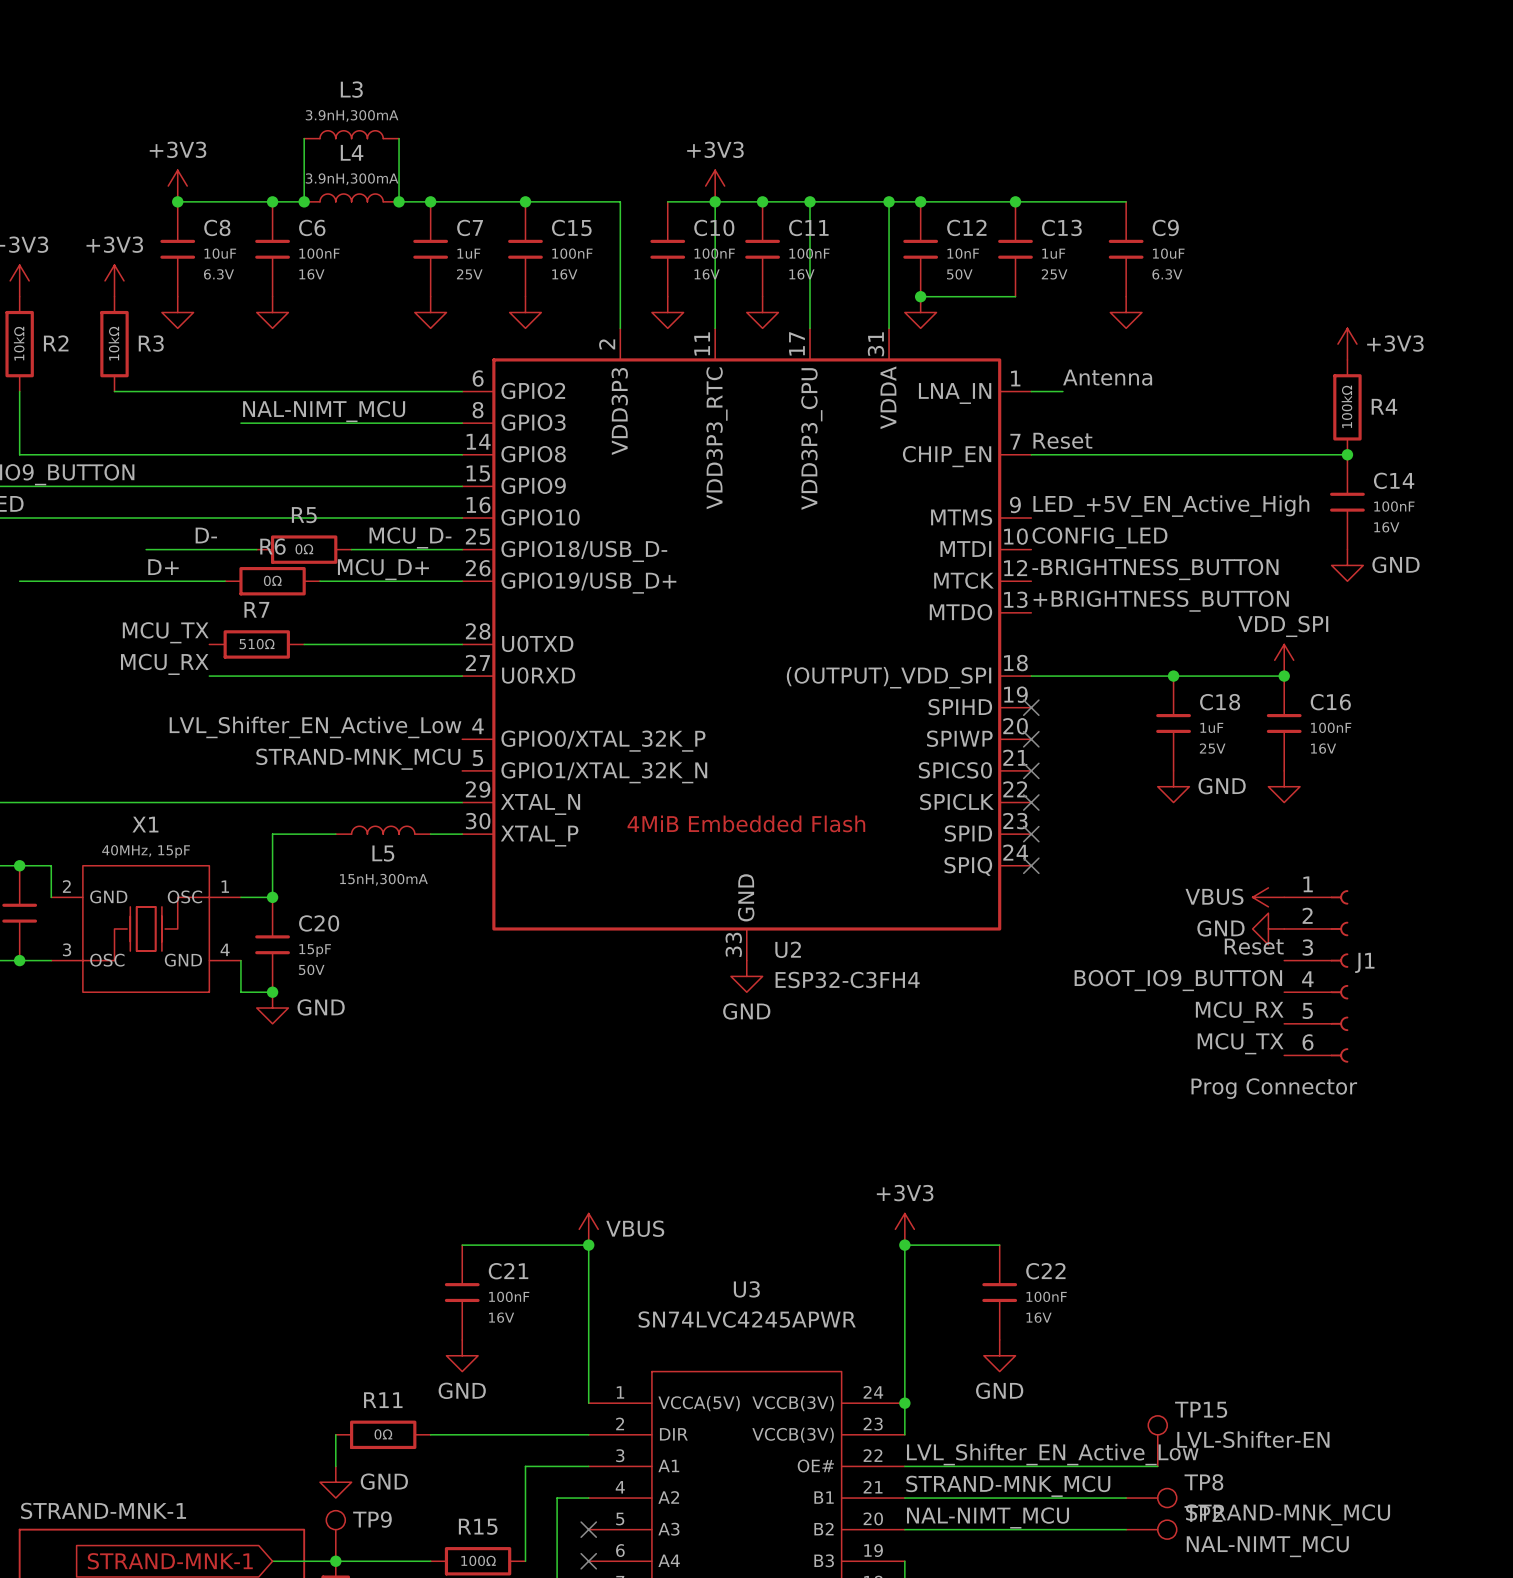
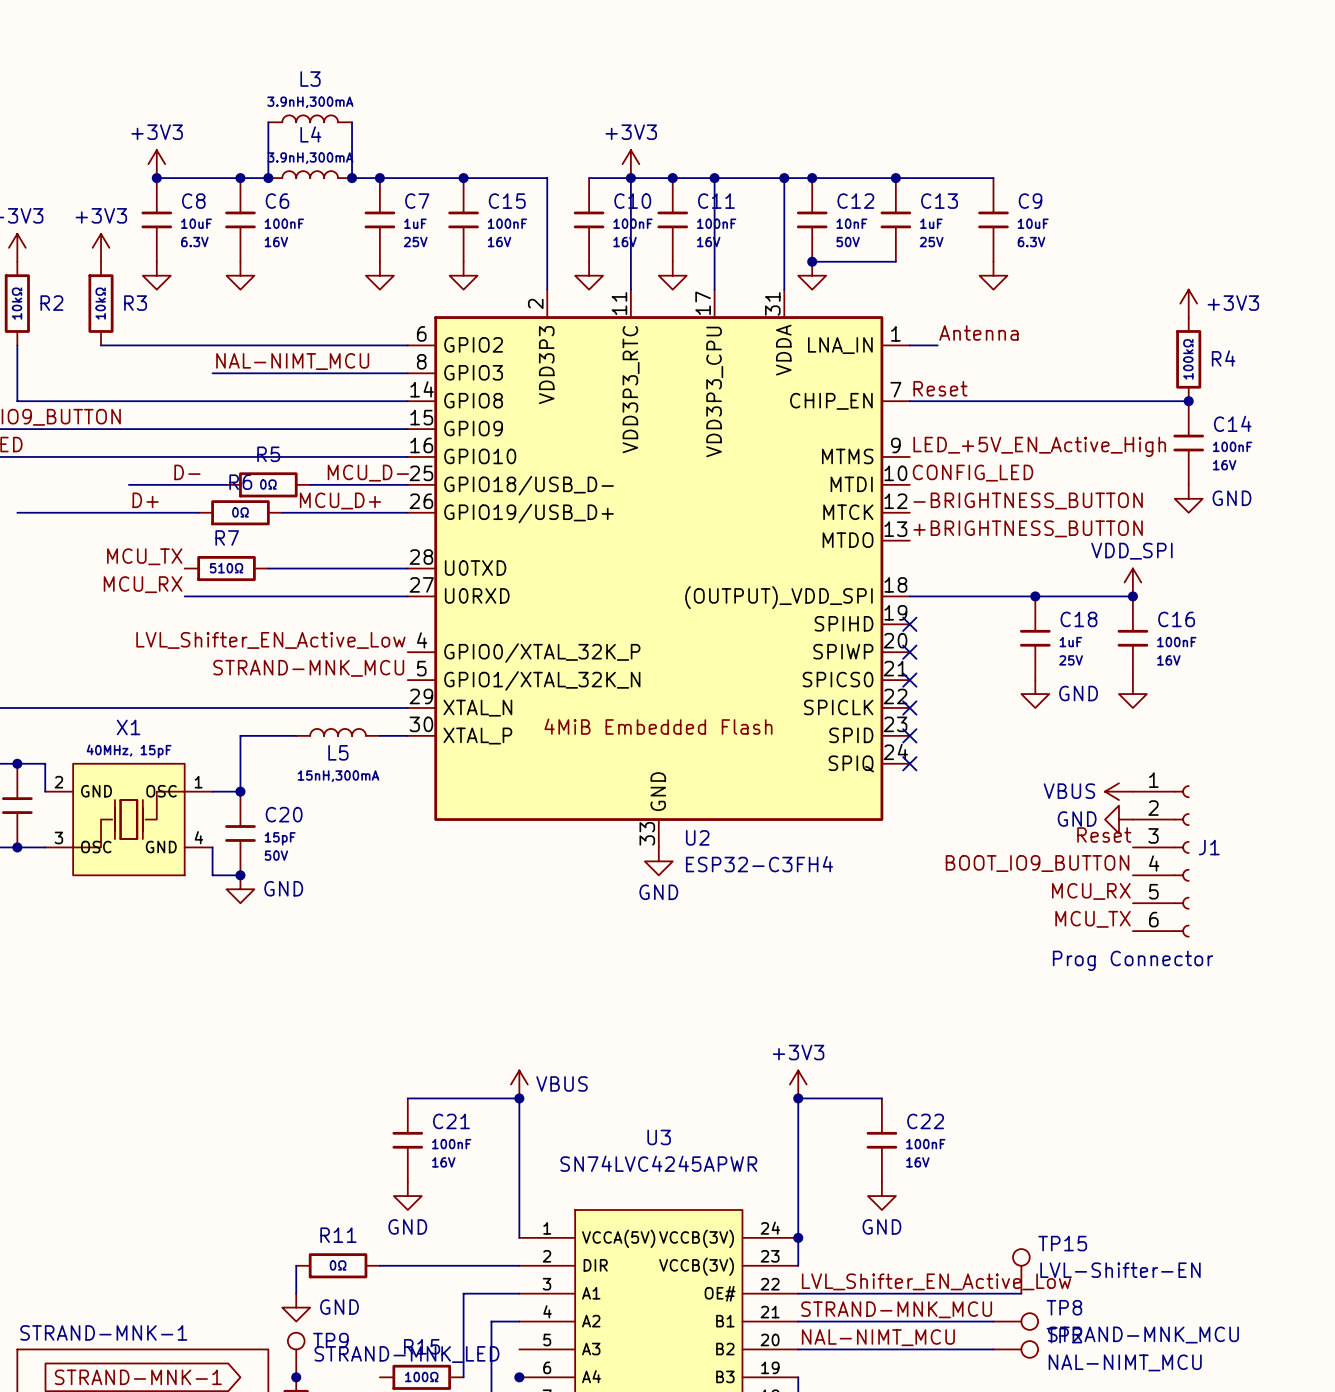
no-connect mark: (588, 1529) -> none
TP9 value: none -> STRAND-MNK_LED (406, 1354)
wire: (272, 1561) (430, 1561) -> none
no-connect mark: (588, 1561) -> none
junction: none -> (519, 1377)

